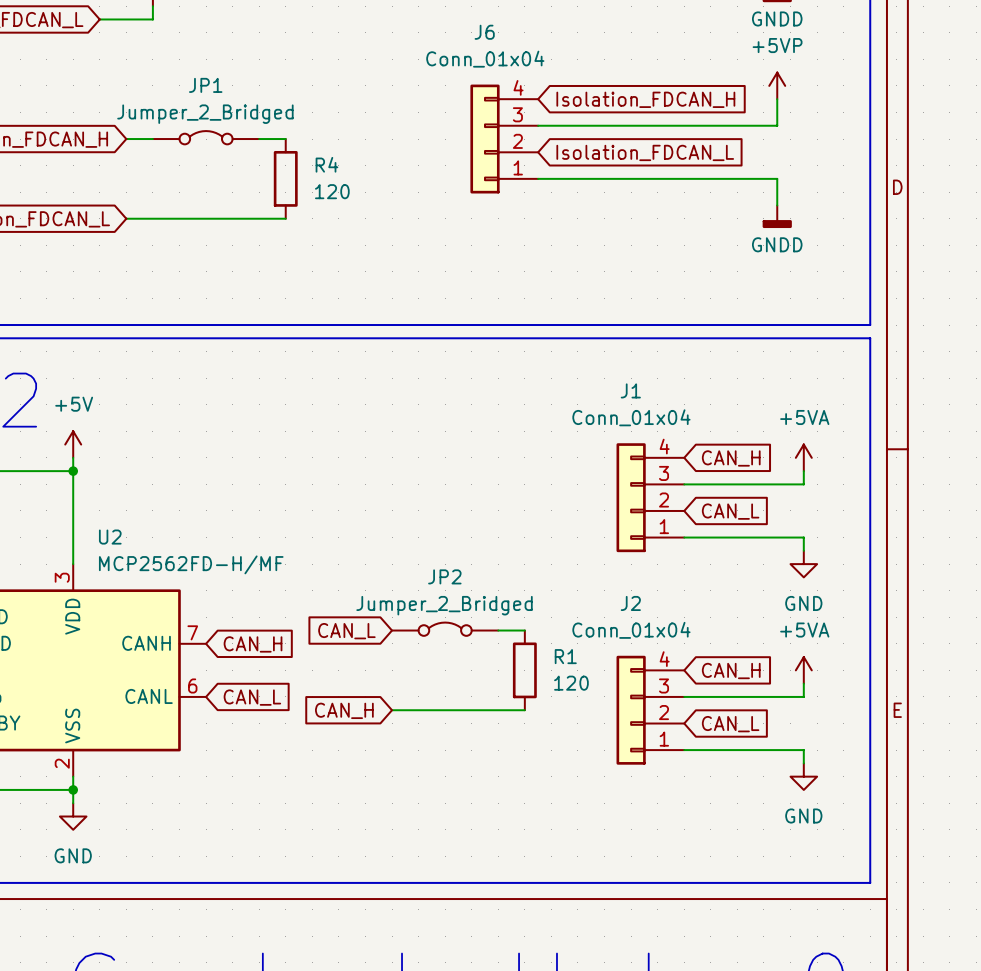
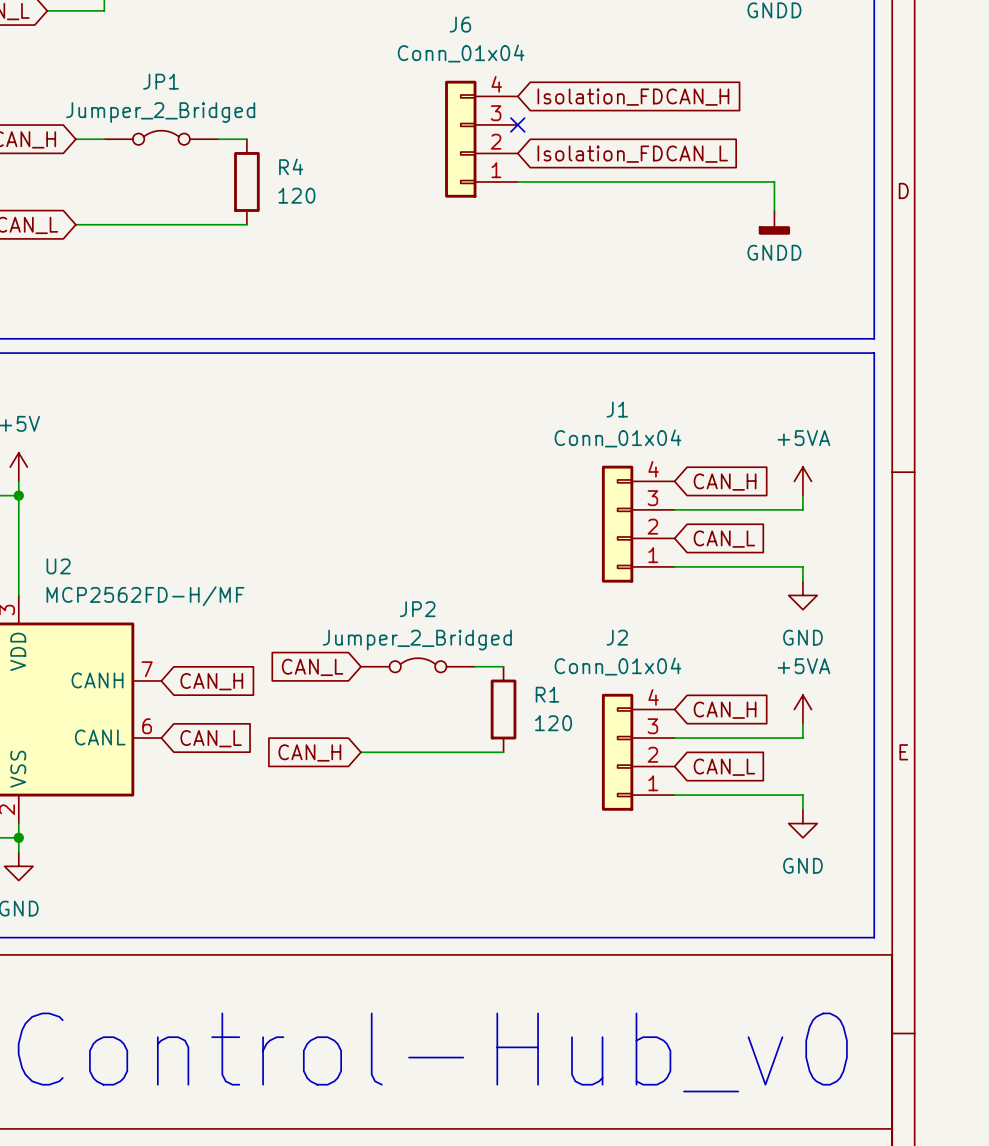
power symbol: +5VP (777, 85) -> none
wire: (777, 99) (777, 125) (538, 125) -> none
no-connect mark: none -> (517, 124)

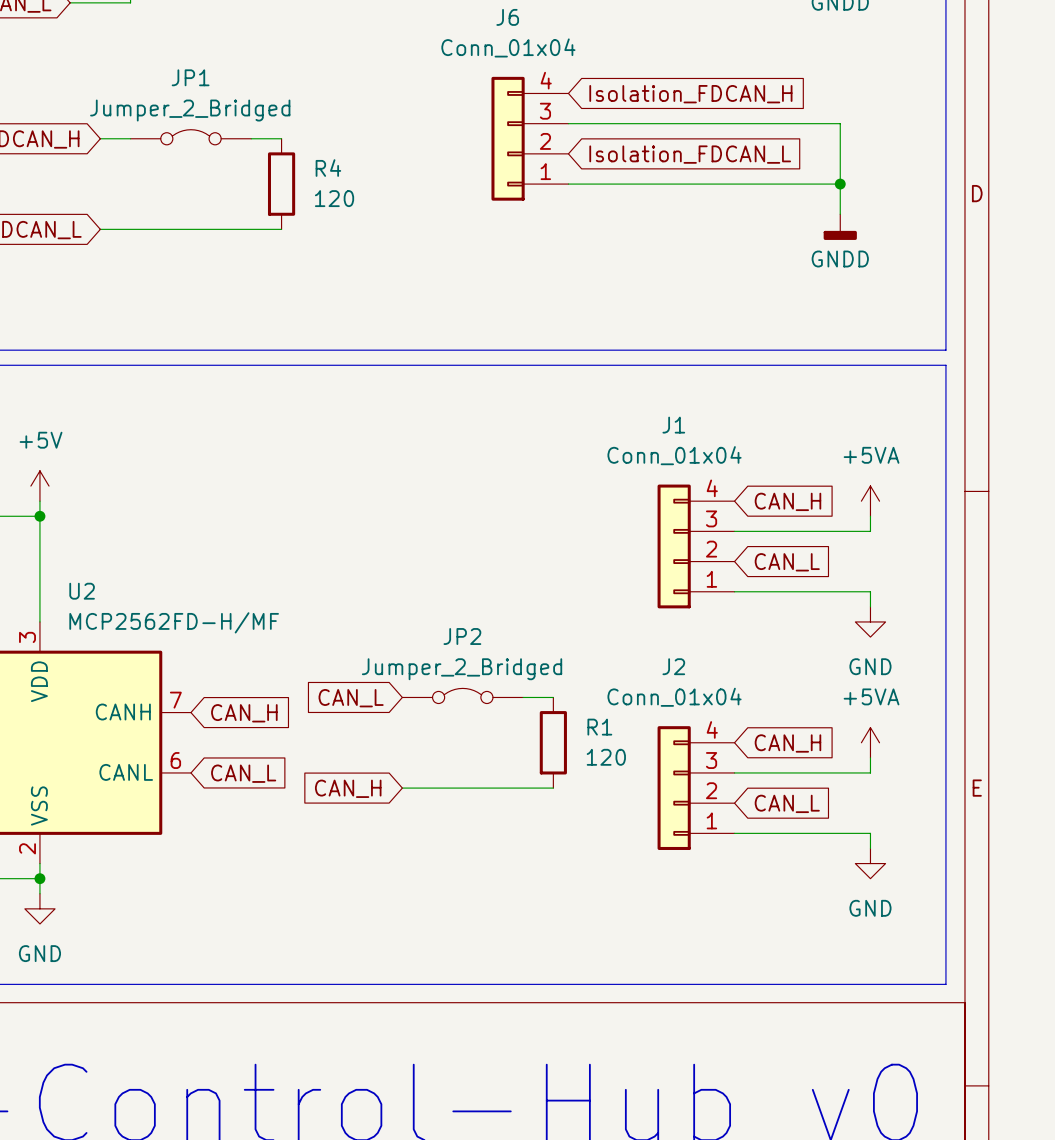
wire: none -> (568, 123) (840, 123) (840, 184)
no-connect mark: (517, 124) -> none
junction: none -> (840, 184)

